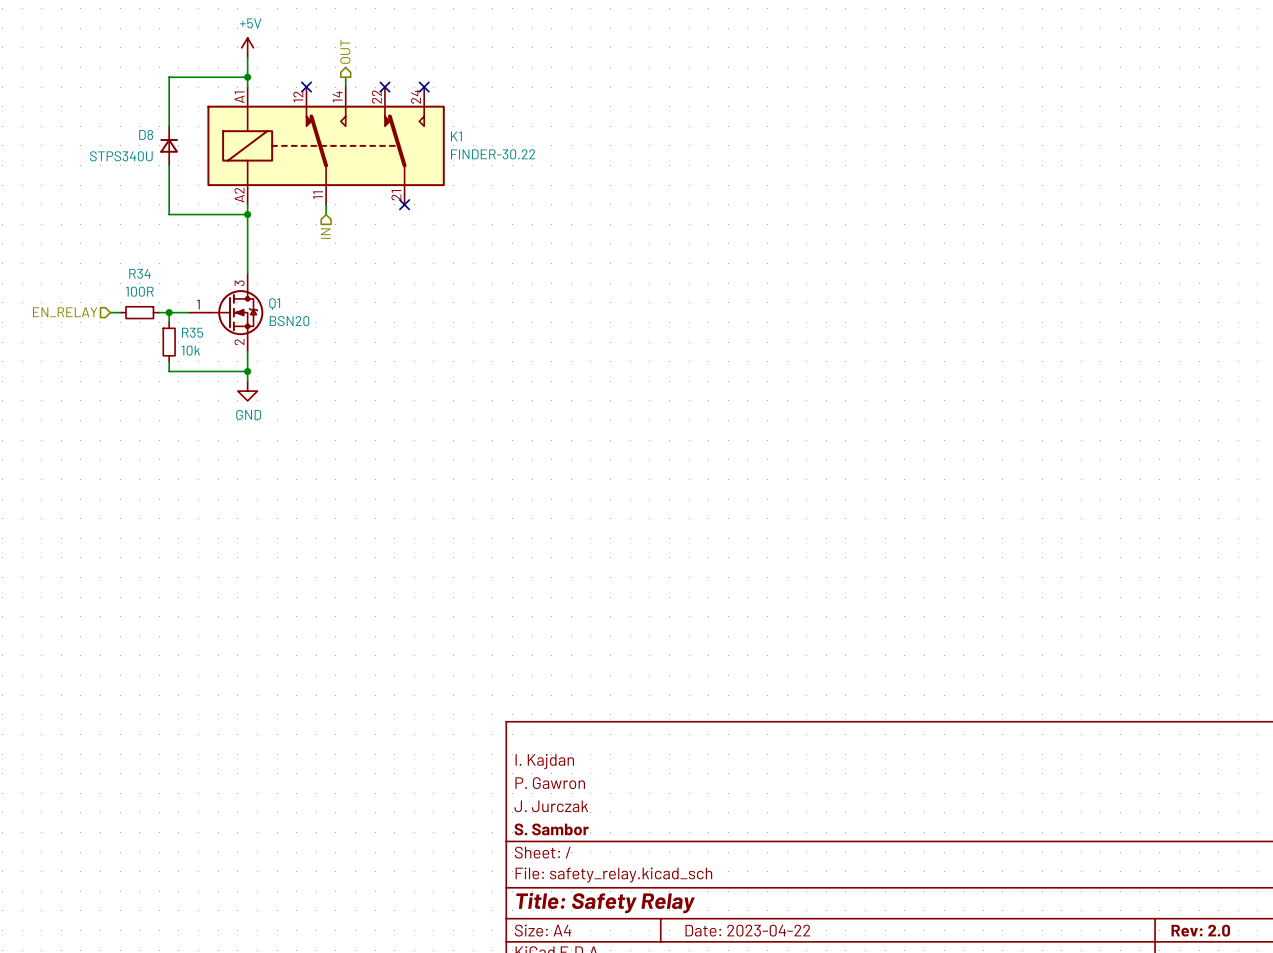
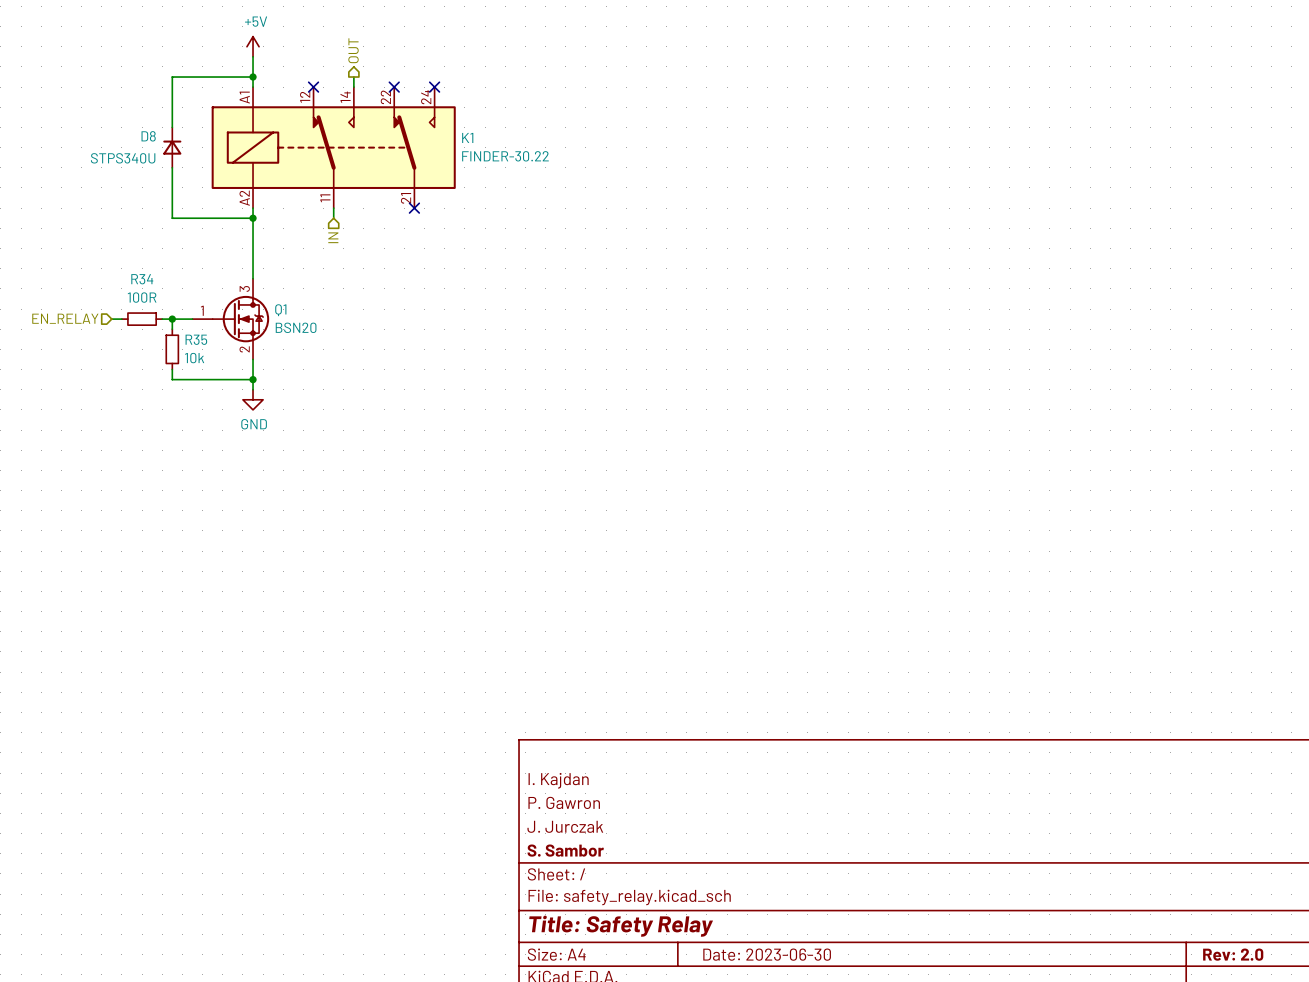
title block: Date: 2023-04-22 (747, 930) -> Date: 2023-06-30 (767, 954)

